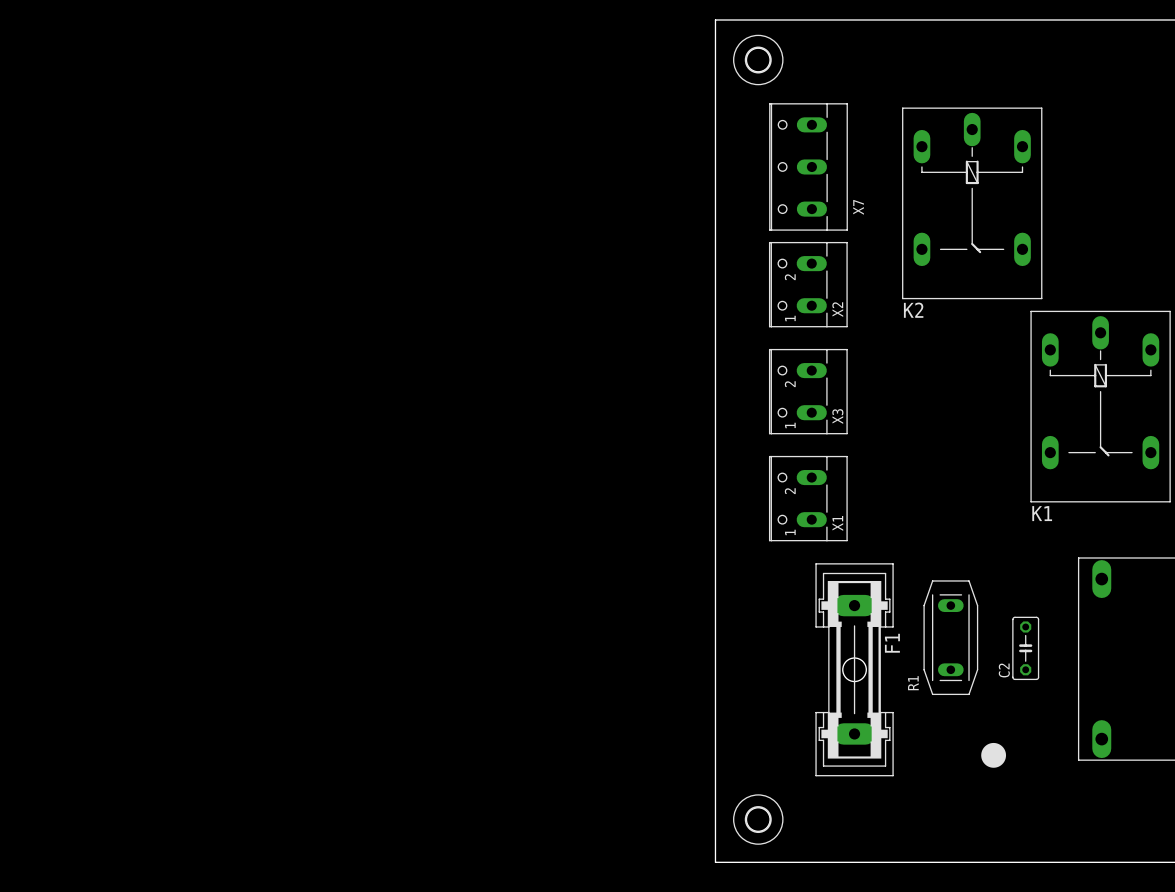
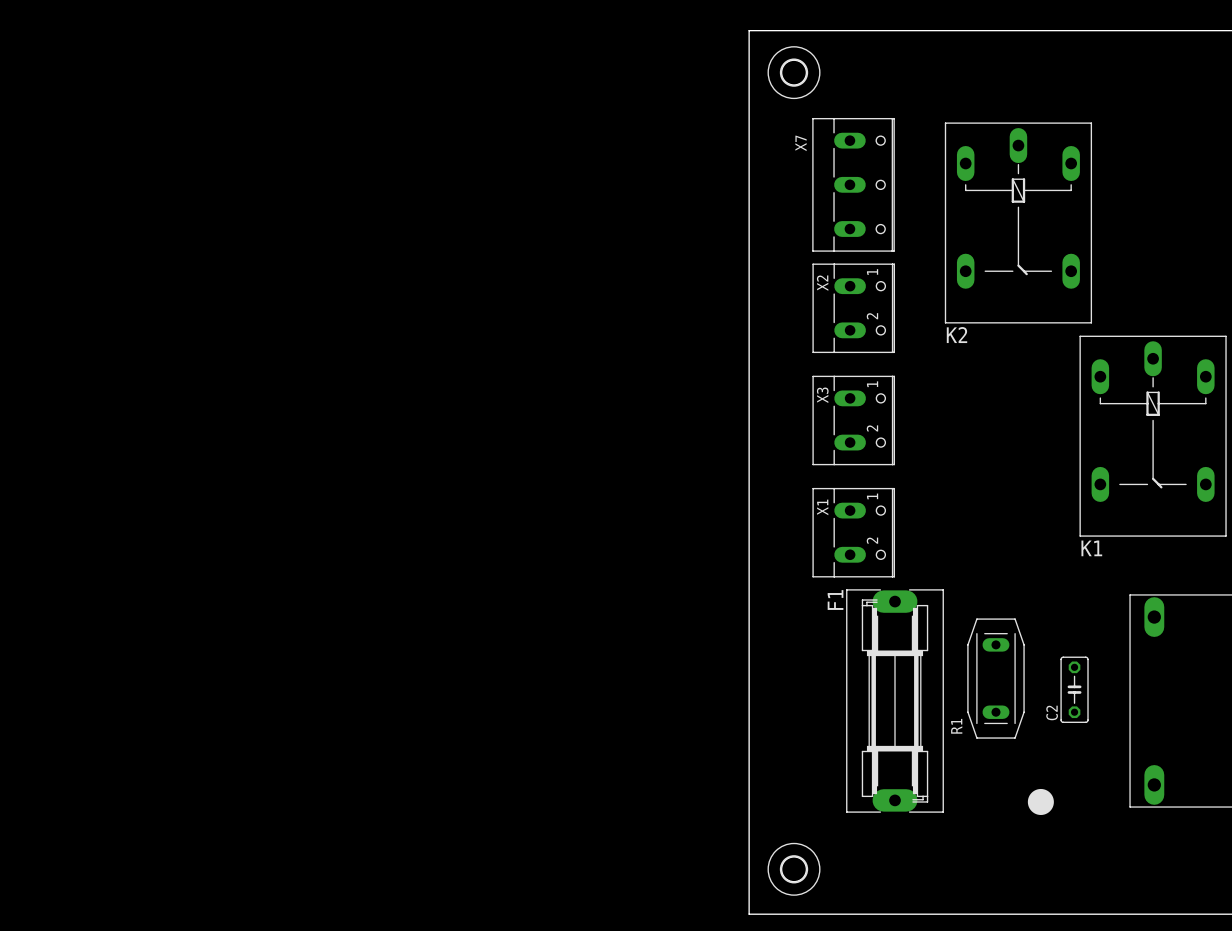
X7 rotation: 0° (808, 166) -> 180° (853, 184)
X2 footprint: [768, 241, 848, 328] -> [812, 263, 896, 354]
X2 name position: X2 (837, 309) -> X2 (822, 283)
X3 footprint: [768, 348, 848, 435] -> [812, 375, 896, 466]
X3 name position: X3 (837, 416) -> X3 (822, 395)
X1 footprint: [768, 455, 848, 542] -> [812, 487, 896, 578]
X1 name position: X1 (837, 523) -> X1 (822, 507)
F1 footprint: [815, 563, 894, 777] -> [846, 589, 944, 813]
F1 name position: F1 (892, 643) -> F1 (835, 600)

